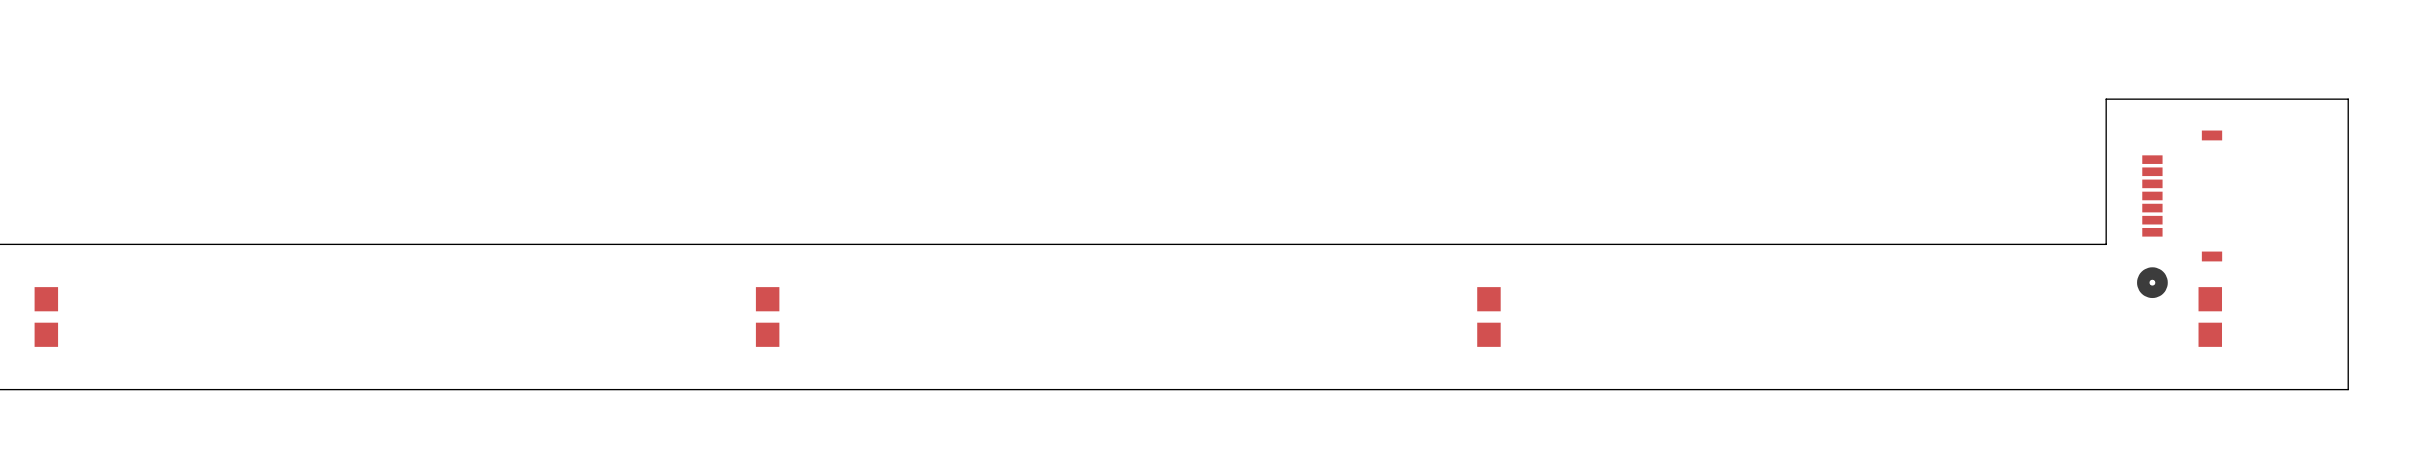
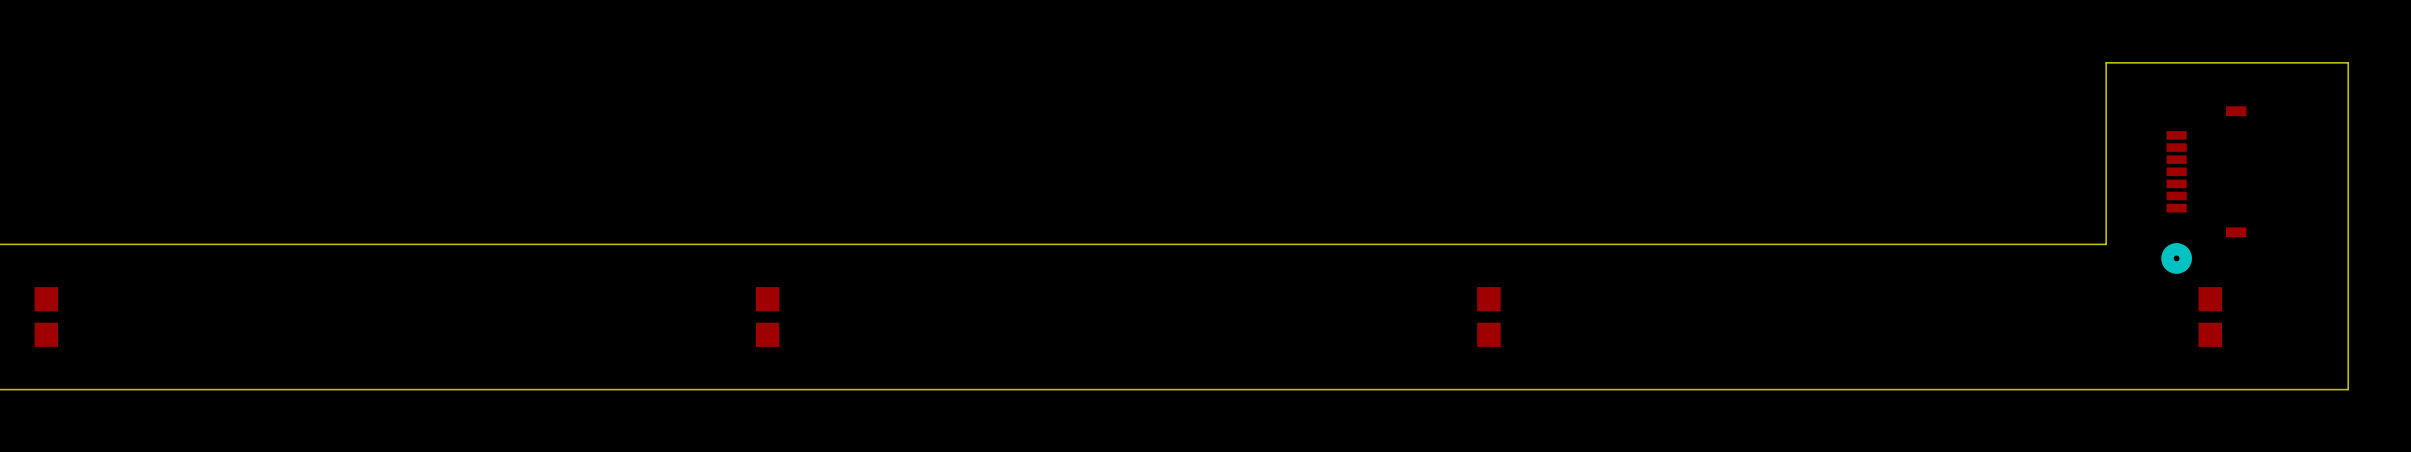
board edge: (2348, 99) (2106, 99) -> (2348, 99) (2348, 62) (2106, 62) (2106, 99)
part position: (2179, 214) -> (2203, 190)

